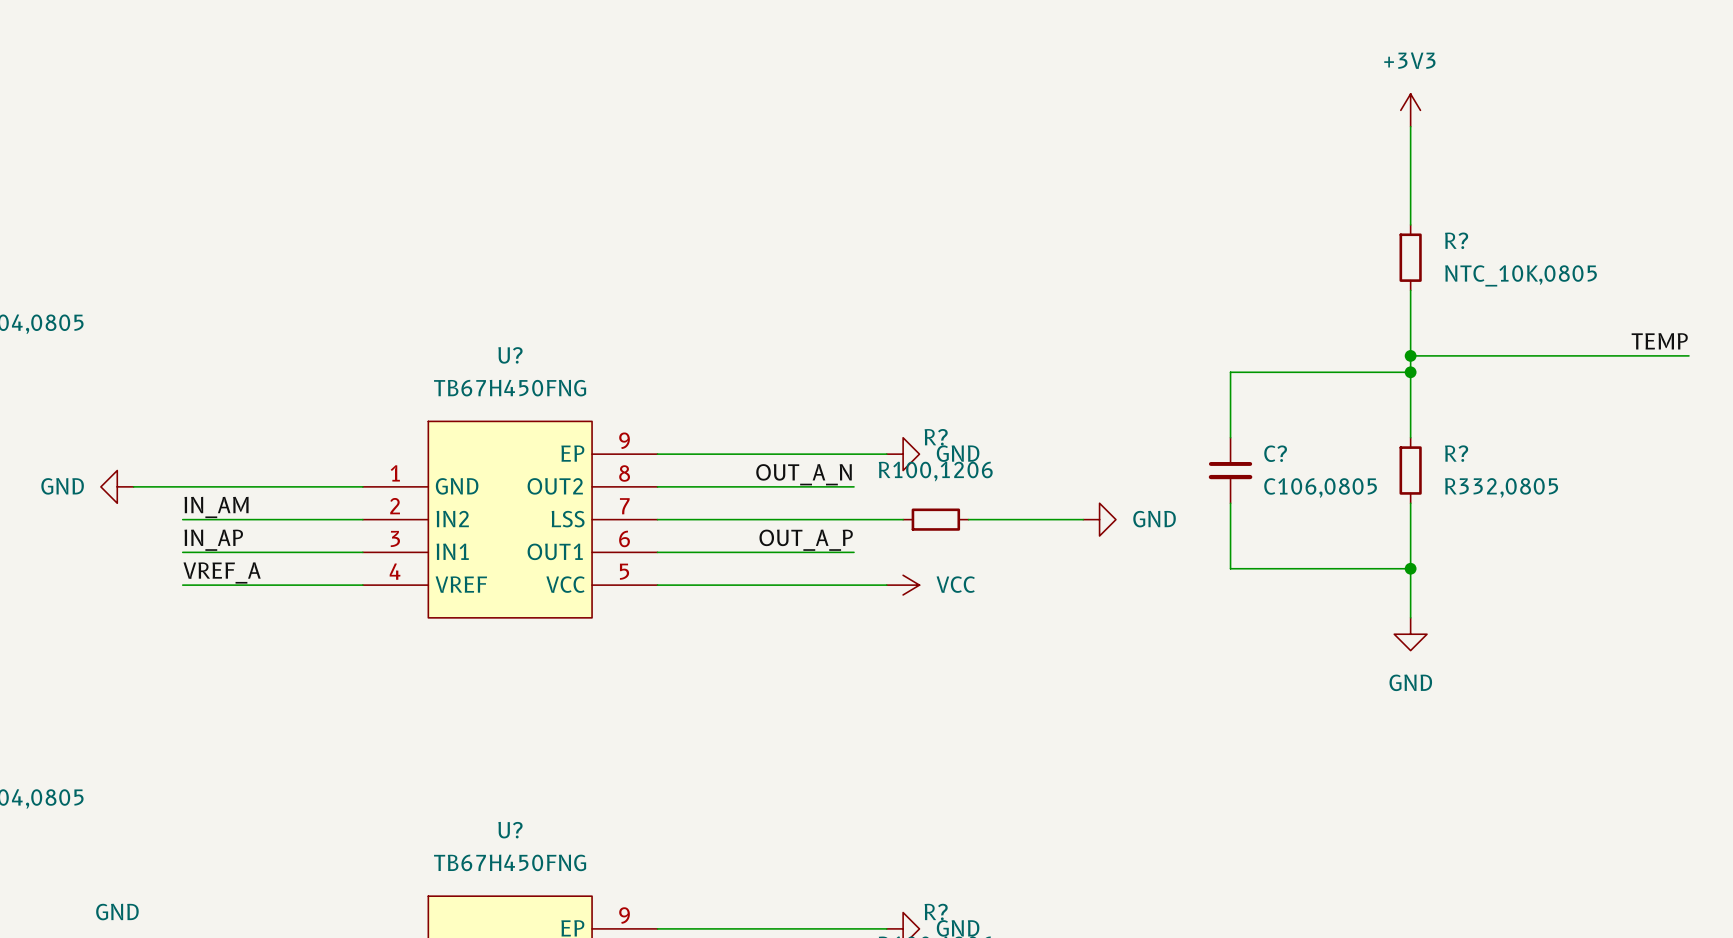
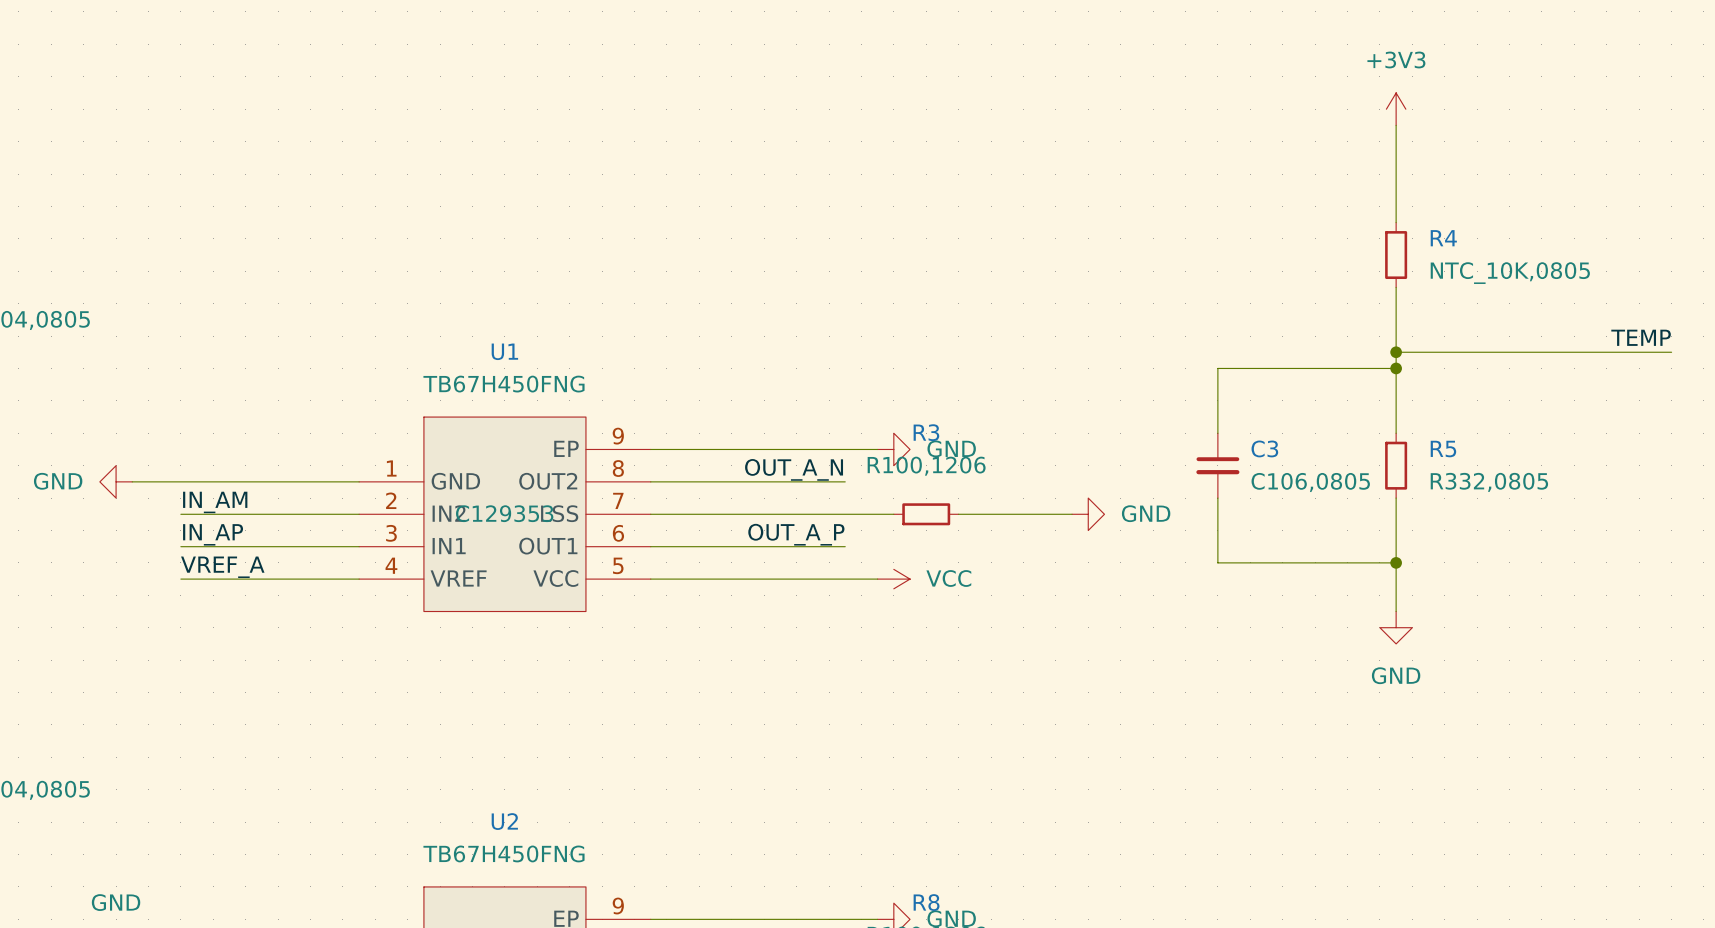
R? name: R? (1456, 240) -> R4 (1443, 238)
U? name: U? (510, 355) -> U1 (504, 351)
R? name: R? (936, 437) -> R3 (926, 432)
C? name: C? (1275, 453) -> C3 (1264, 448)
R? name: R? (1456, 453) -> R5 (1443, 449)
U? text: none -> C129353 (504, 513)
U? name: U? (510, 830) -> U2 (504, 821)
R? name: R? (936, 912) -> R8 (926, 902)

